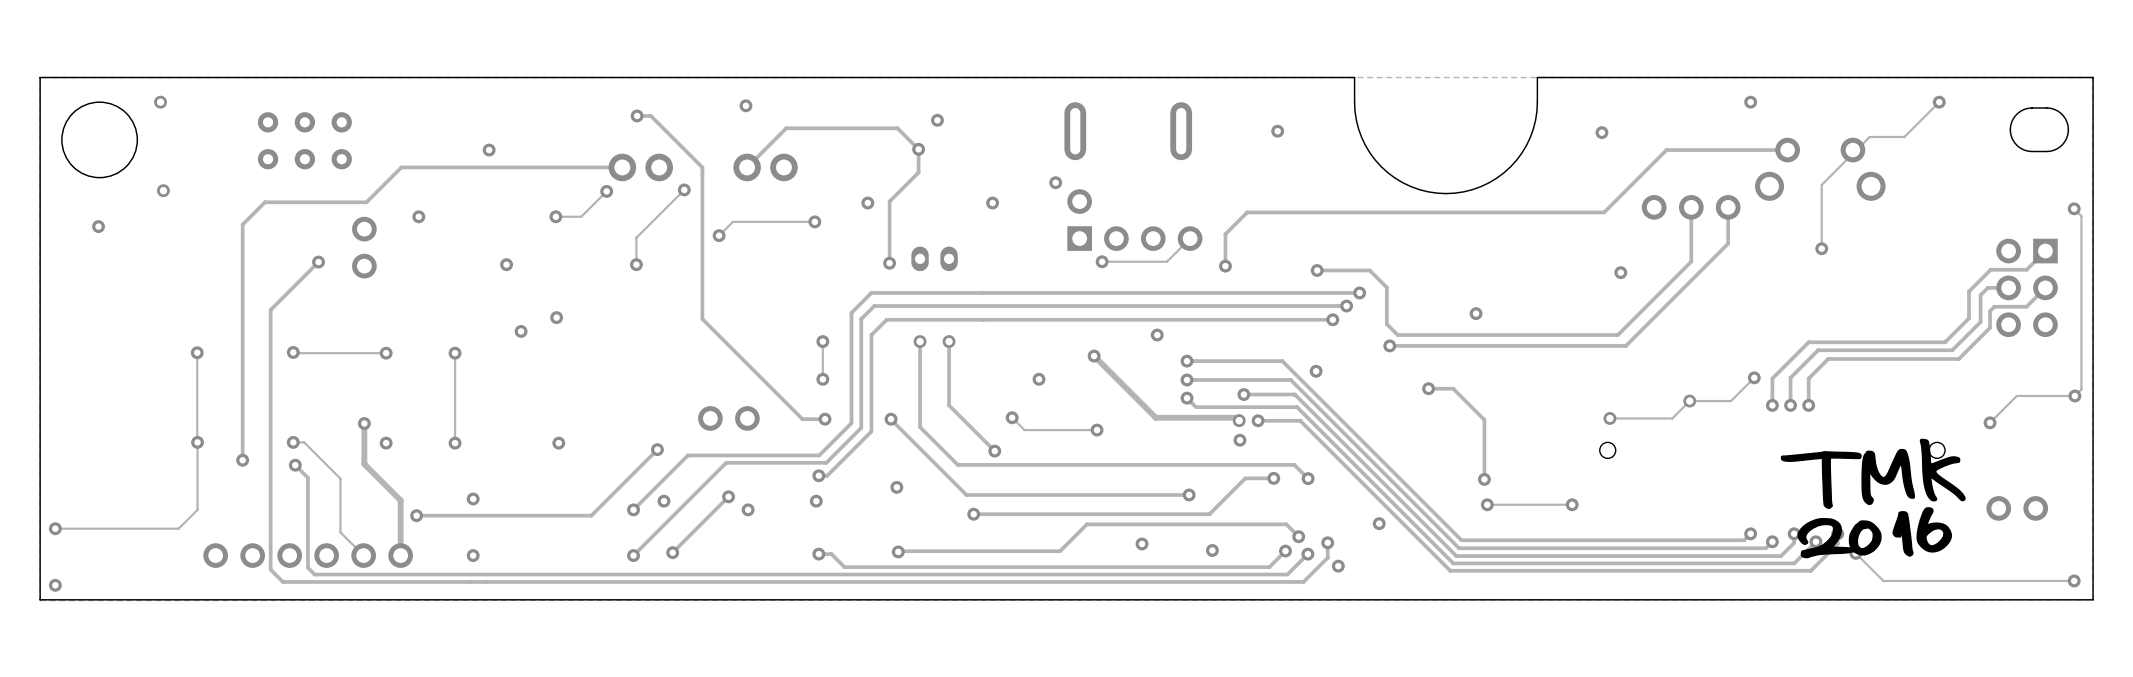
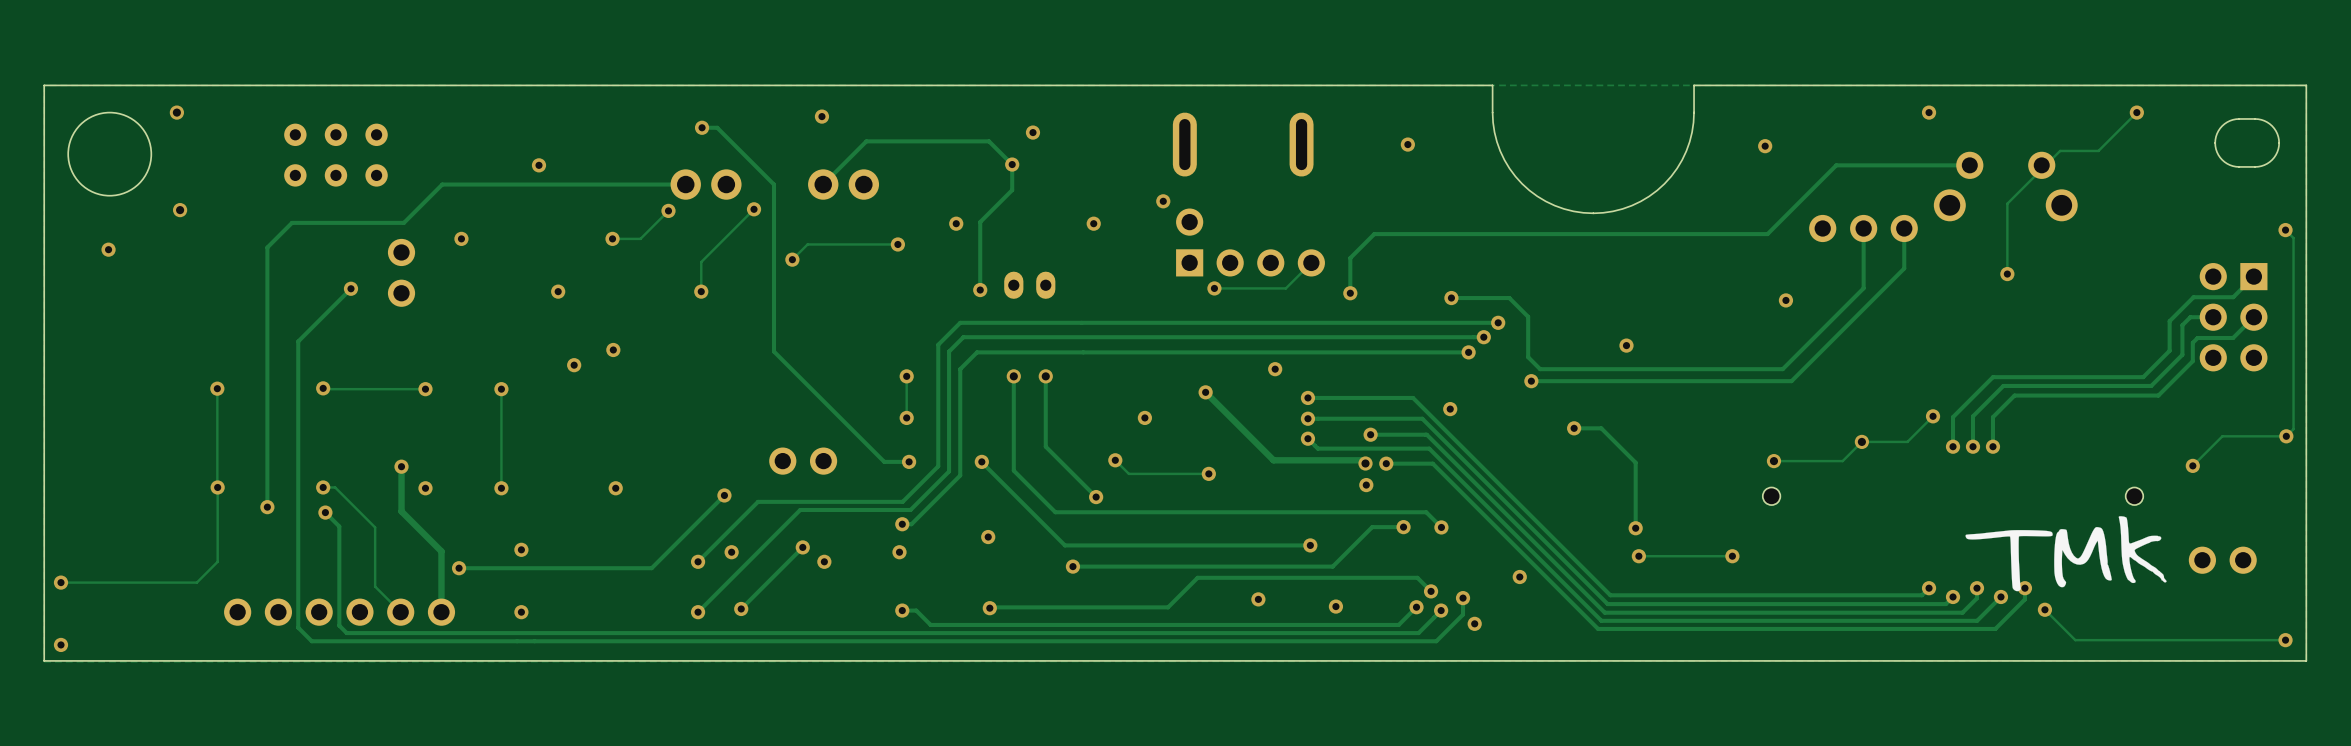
drawing shape: [1780, 438, 1966, 559] -> [1965, 516, 2167, 592]

